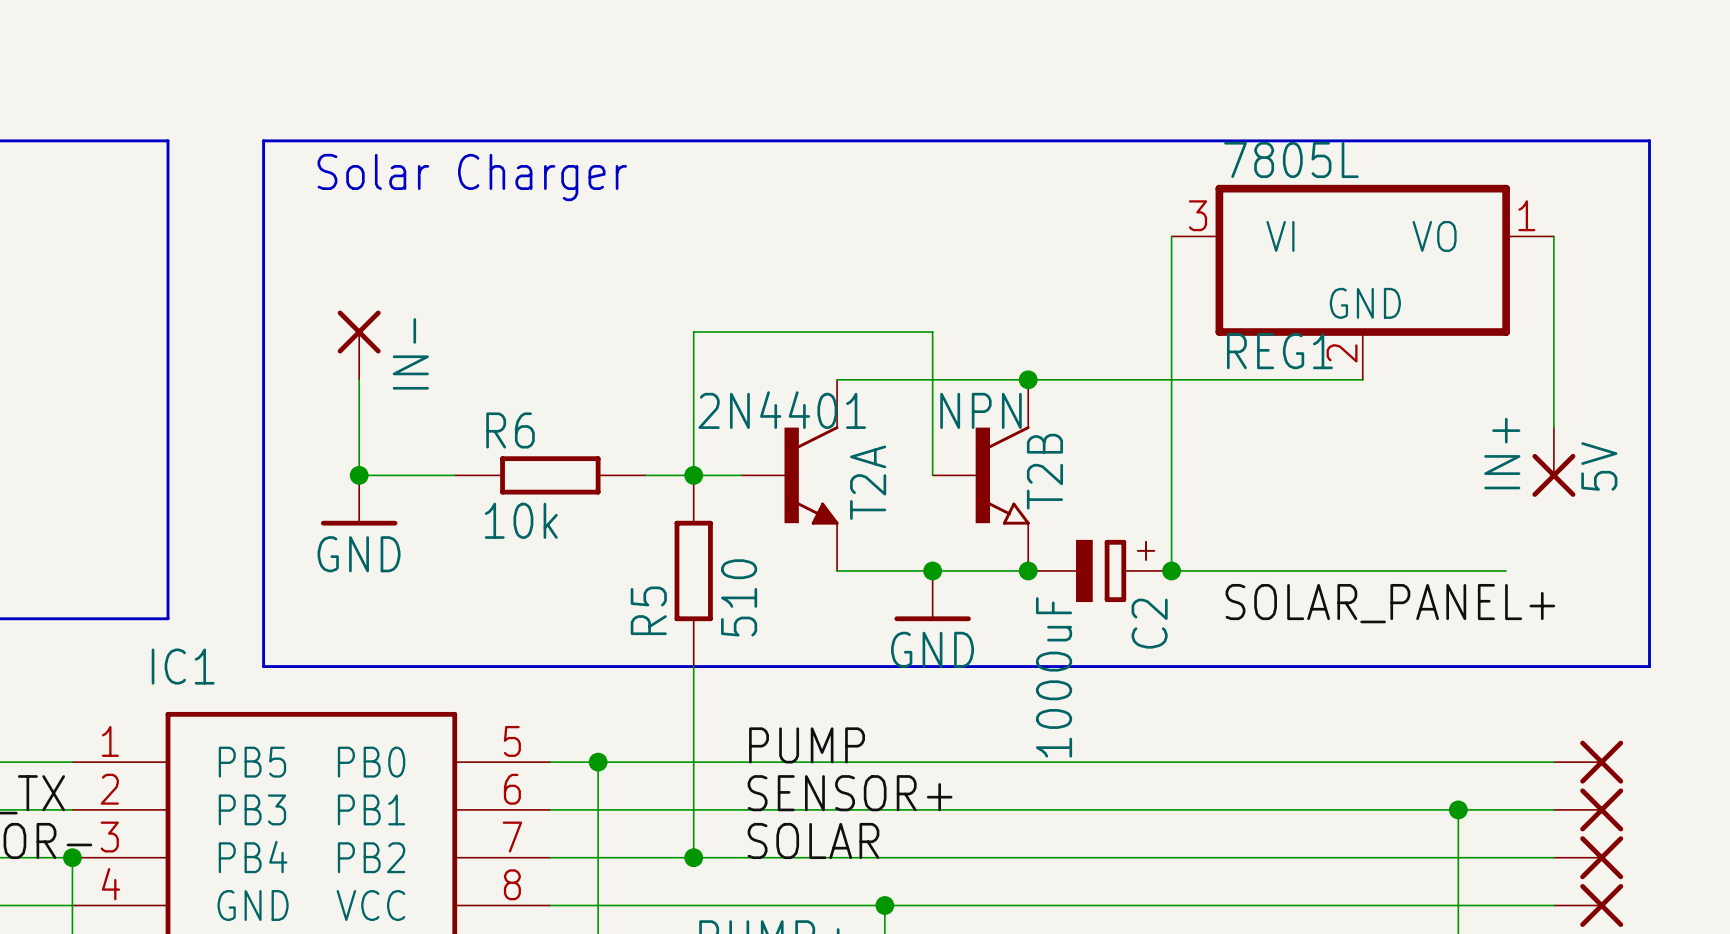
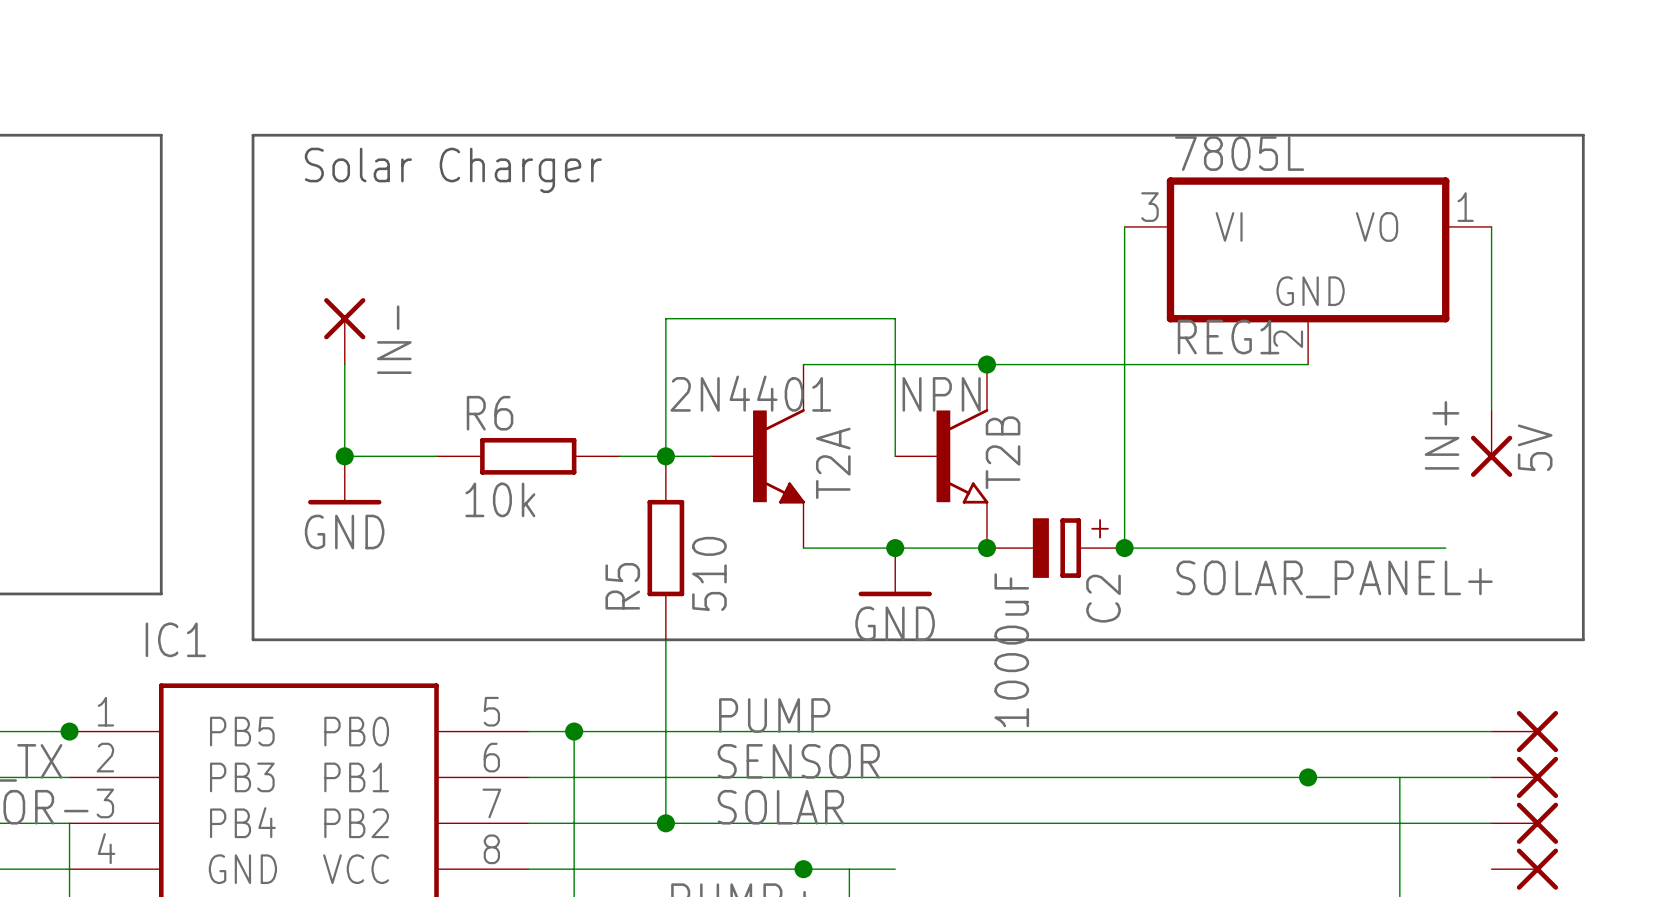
label: SENSOR+ (850, 793) -> SENSOR (798, 761)
junction position: (1458, 809) -> (1308, 777)
junction position: (72, 857) -> (69, 731)
junction position: (884, 905) -> (803, 869)
wire: (932, 905) (1553, 905) -> none

